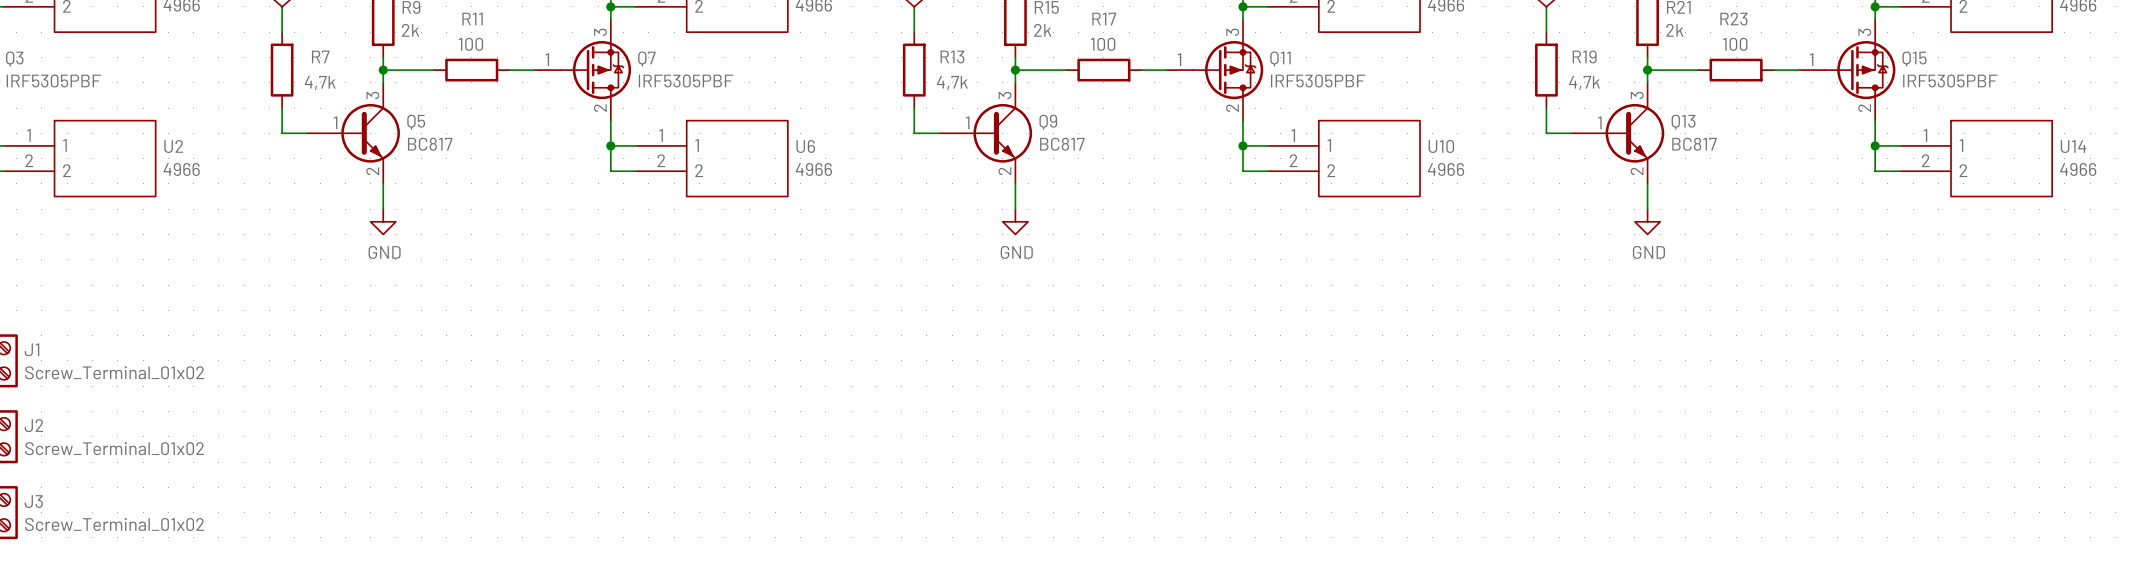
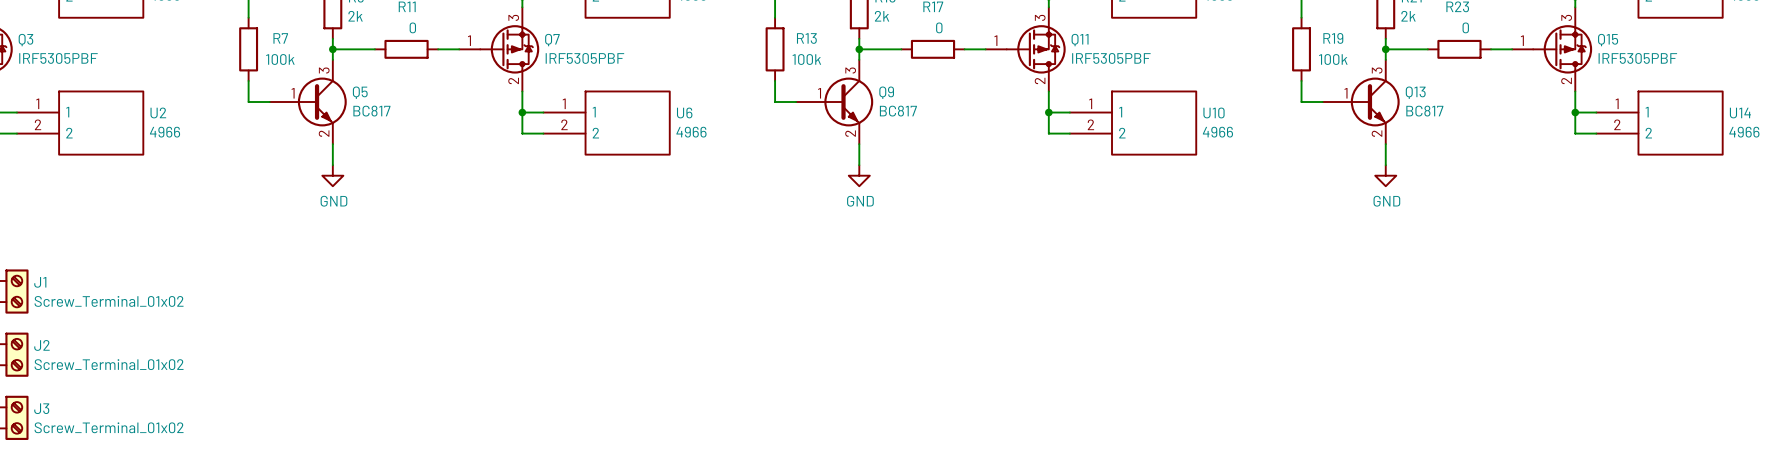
R11 value: 100 (470, 44) -> 0 (412, 27)
R17 value: 100 (1103, 44) -> 0 (939, 27)
R23 value: 100 (1735, 44) -> 0 (1465, 27)
R7 value: 4,7k (320, 82) -> 100k (280, 59)
R13 value: 4,7k (952, 82) -> 100k (806, 59)
R19 value: 4,7k (1584, 82) -> 100k (1333, 59)

